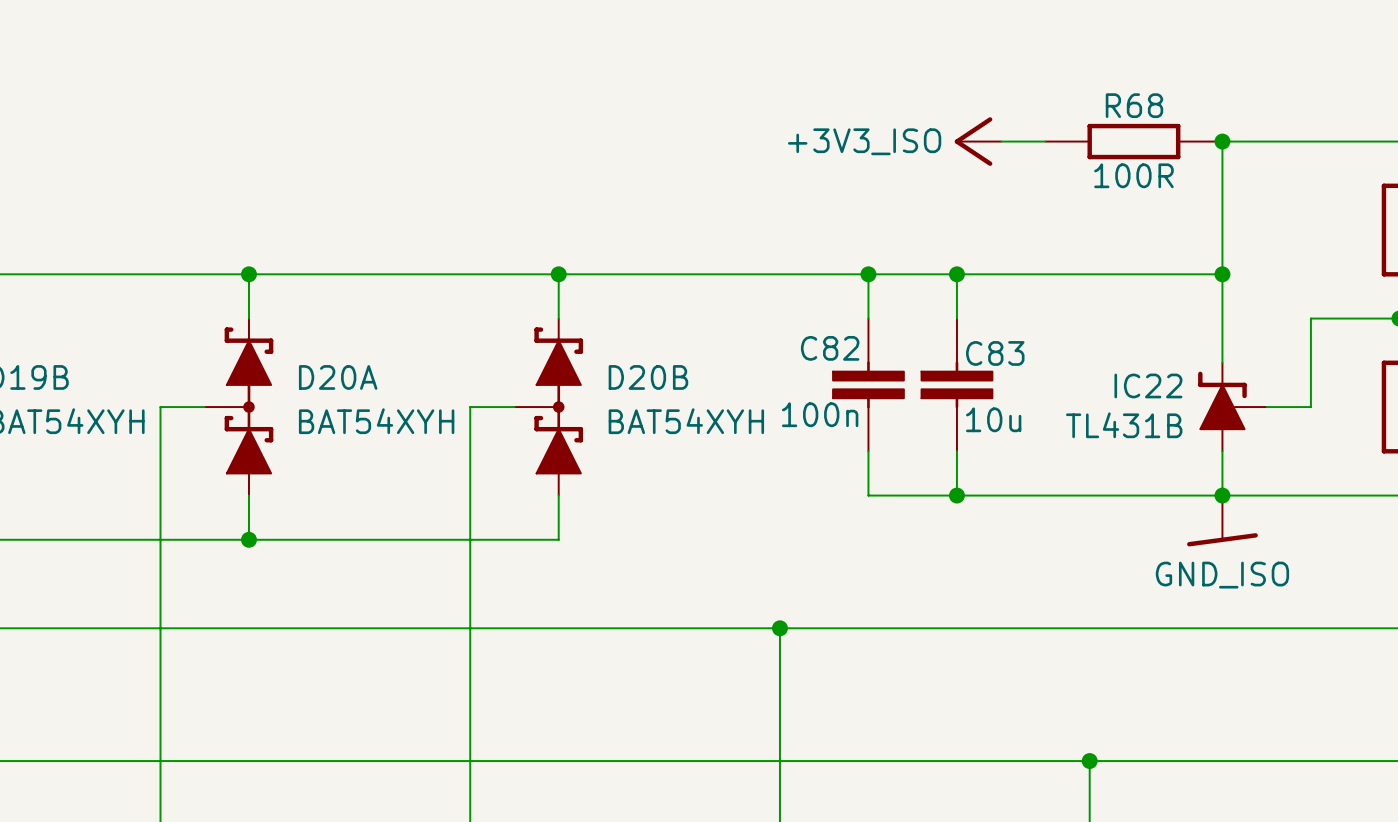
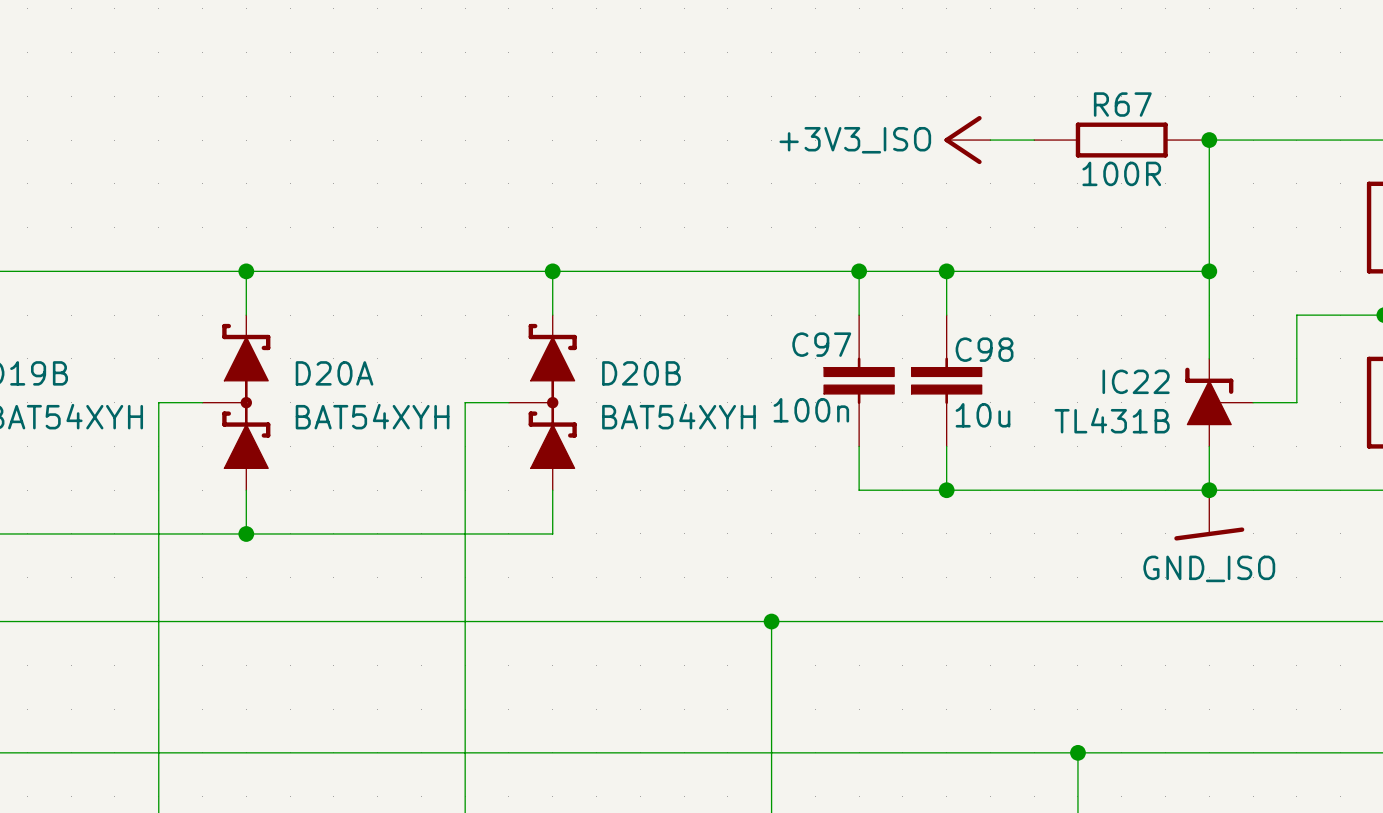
R68 name: R68 (1134, 105) -> R67 (1122, 104)
C82 name: C82 (830, 348) -> C97 (821, 344)
C83 name: C83 (995, 353) -> C98 (984, 349)

